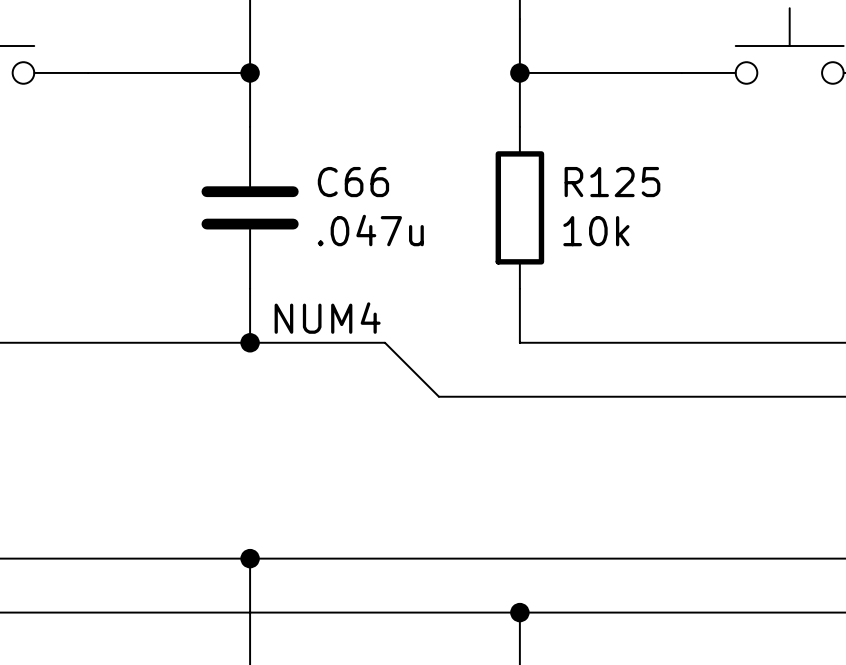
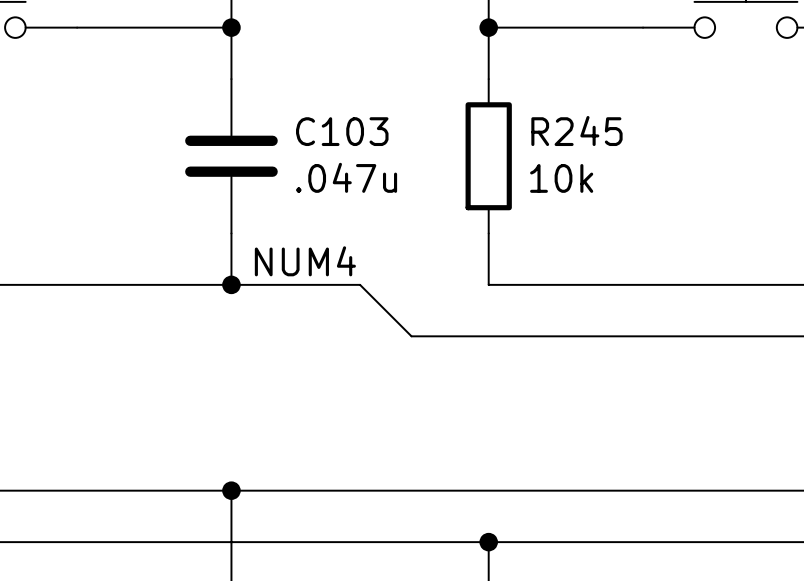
C66 name: C66 (353, 182) -> C103 (342, 131)
R125 name: R125 (612, 182) -> R245 (576, 131)

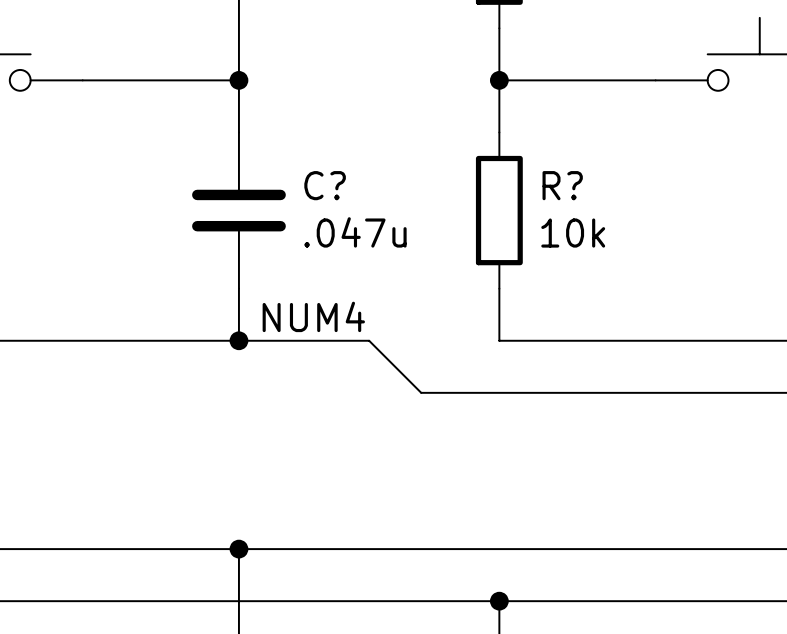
C103 name: C103 (342, 131) -> C? (325, 185)
R245 name: R245 (576, 131) -> R? (562, 185)

